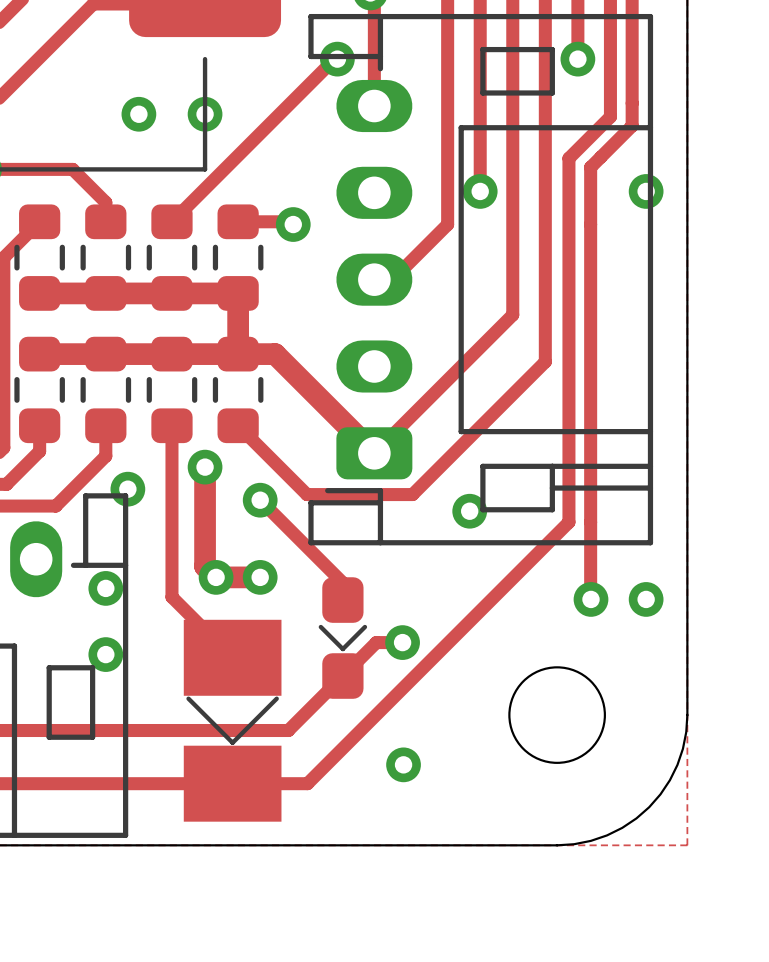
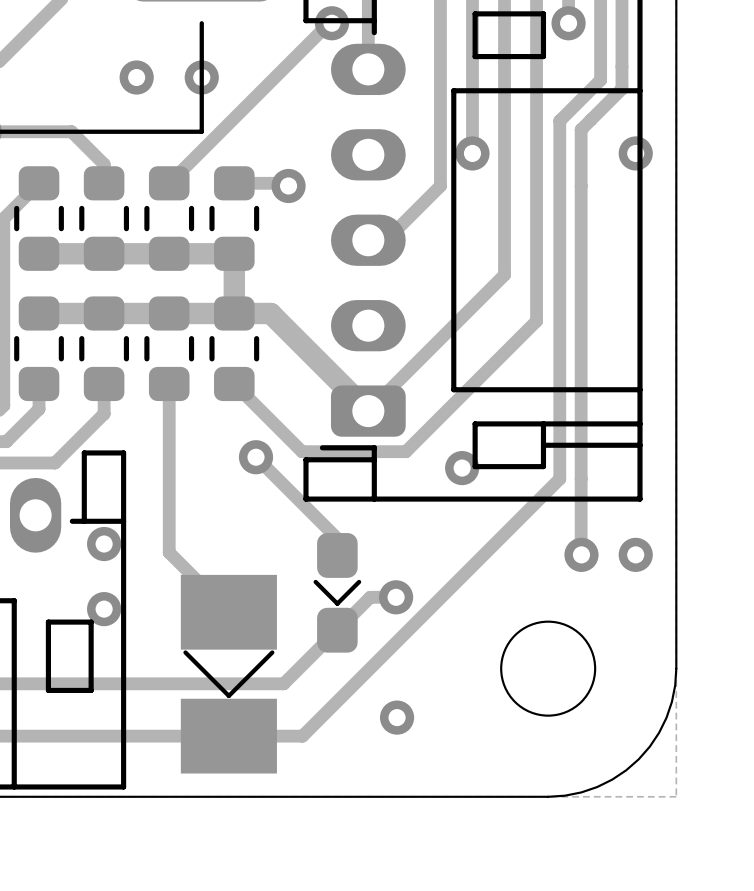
track: (205, 467) (205, 566) (216, 577) (260, 577) -> none
via: (205, 467) -> none
via: (127, 489) -> none
via: (216, 577) -> none
via: (260, 577) -> none

